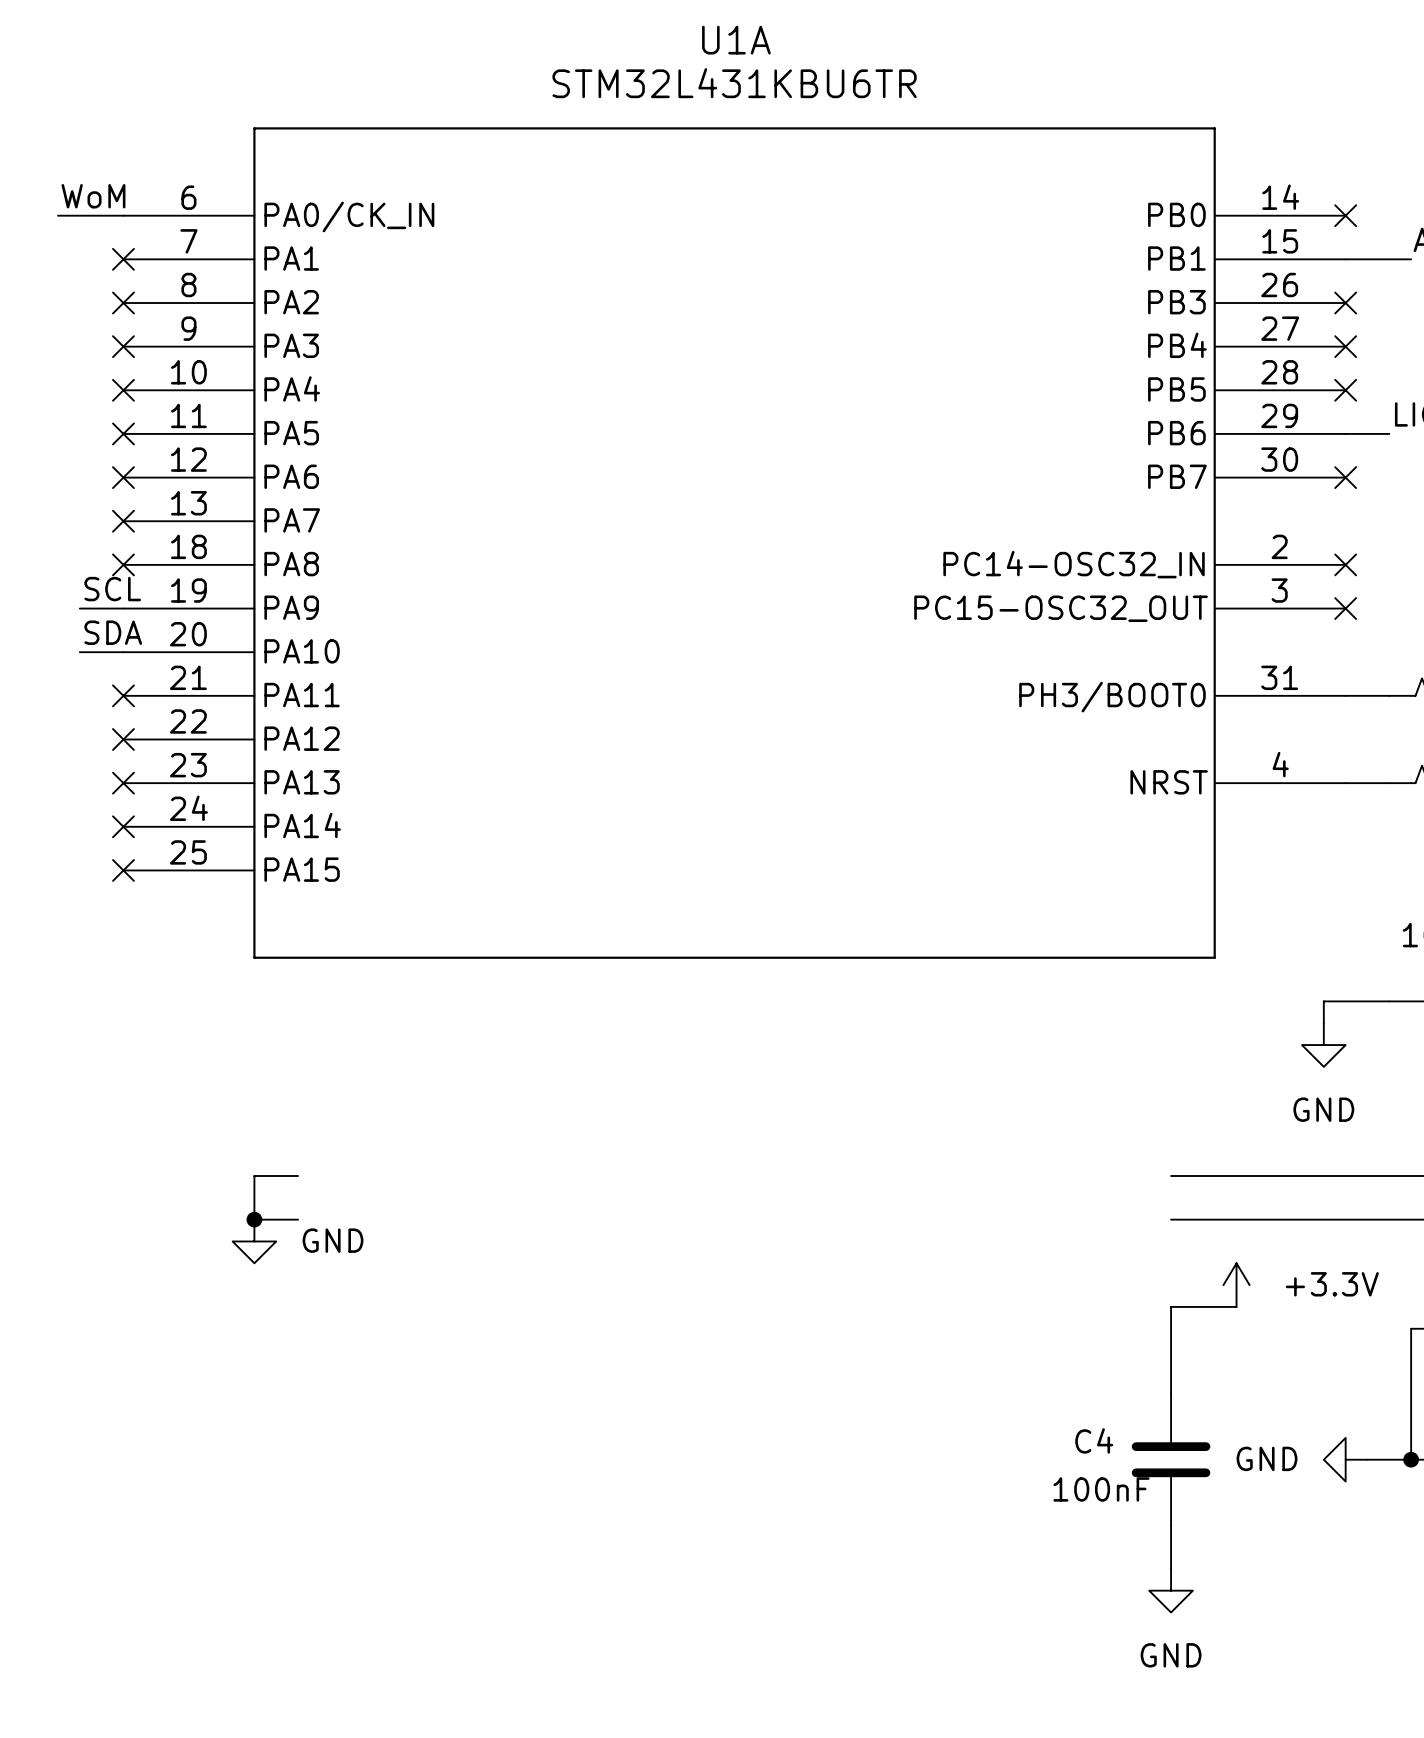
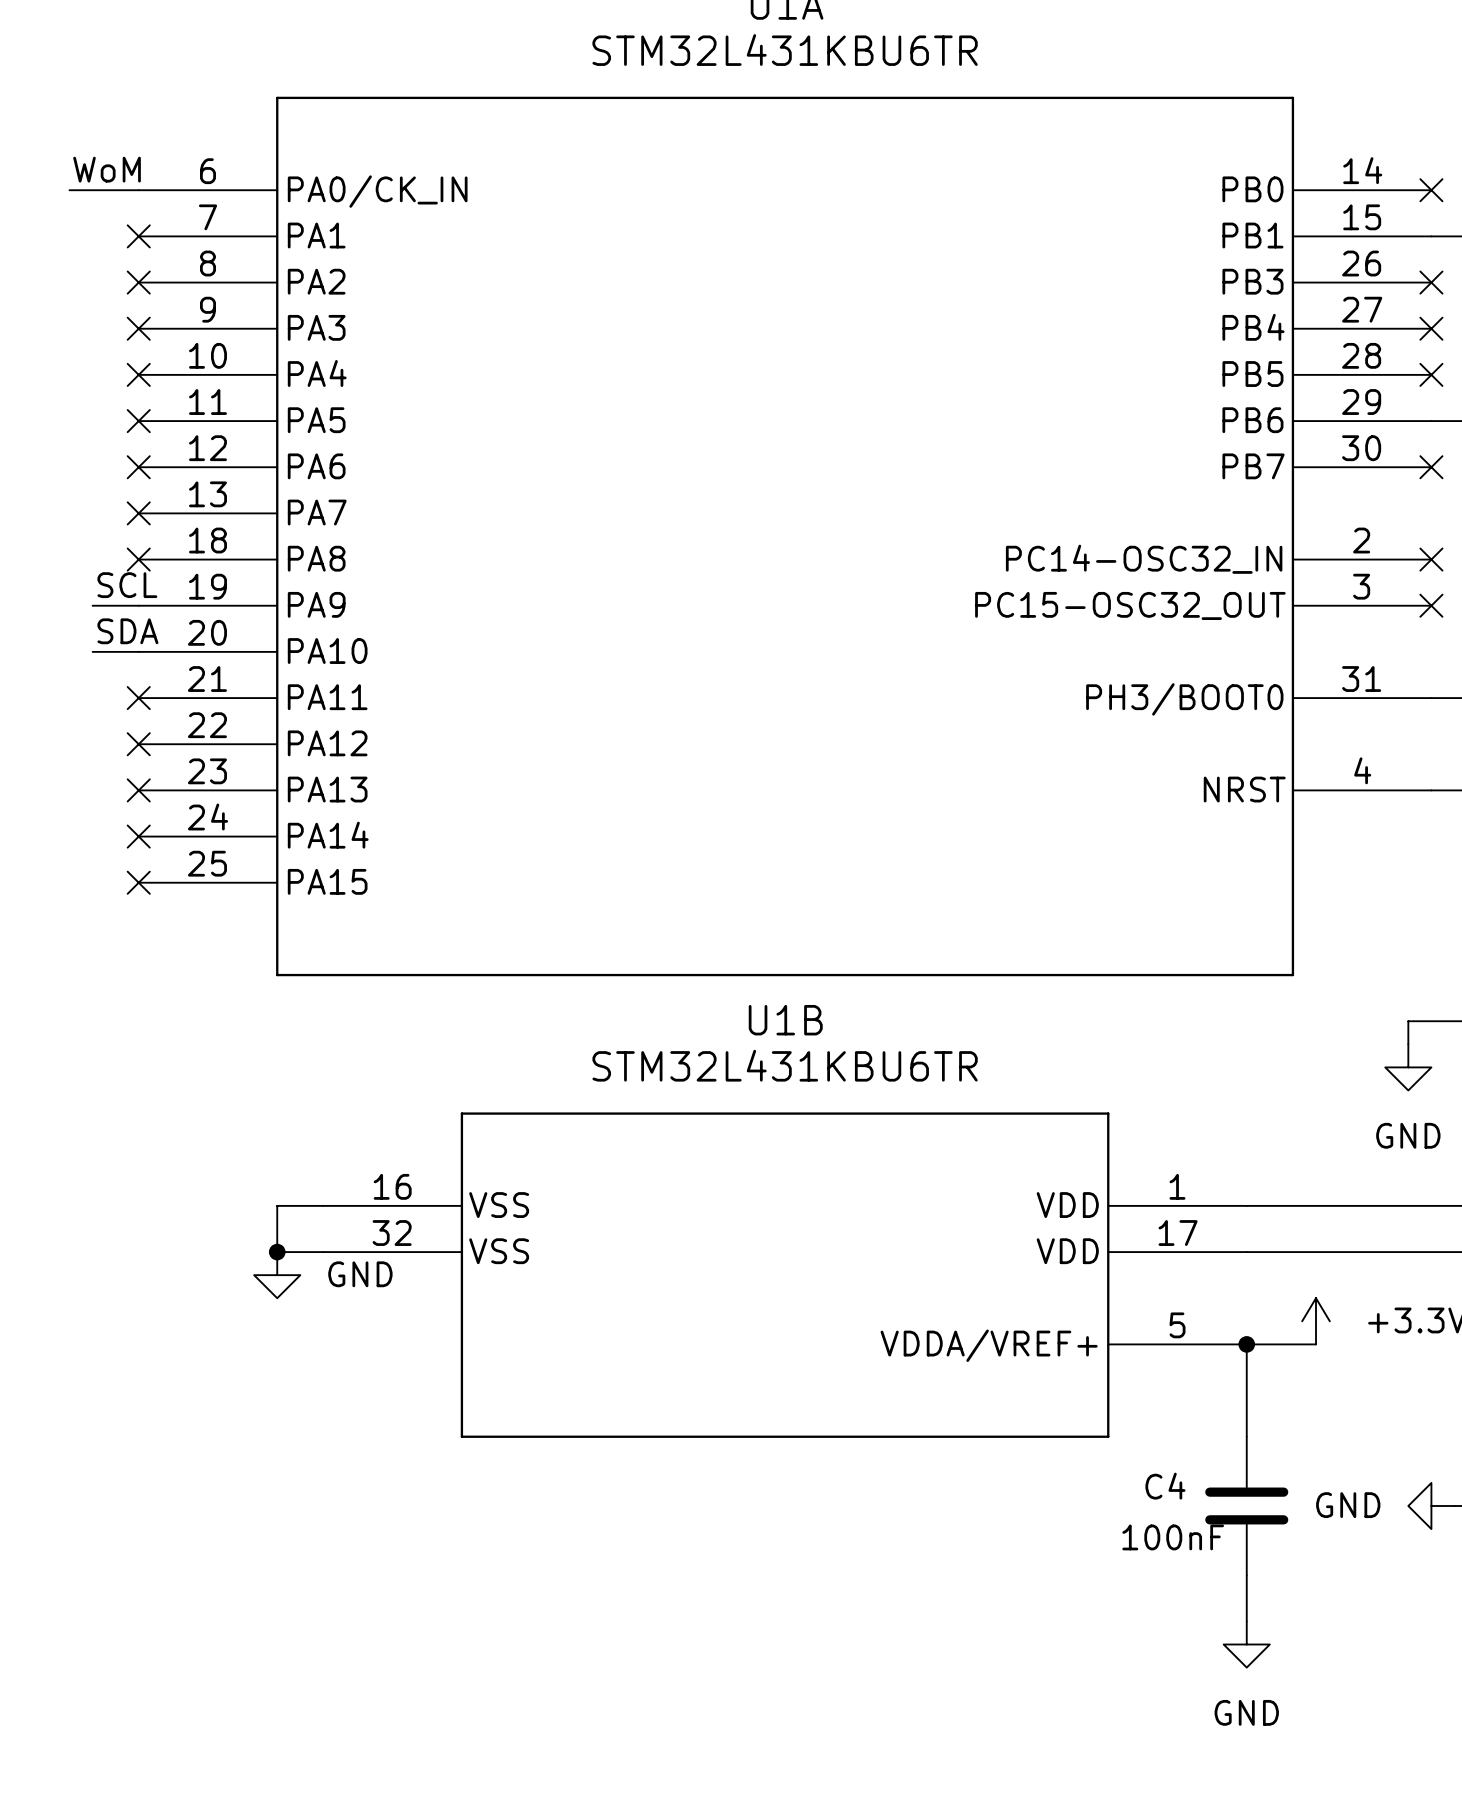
U1B: none -> STM32L431KBU6TR (785, 1275)
junction: none -> (1246, 1344)

